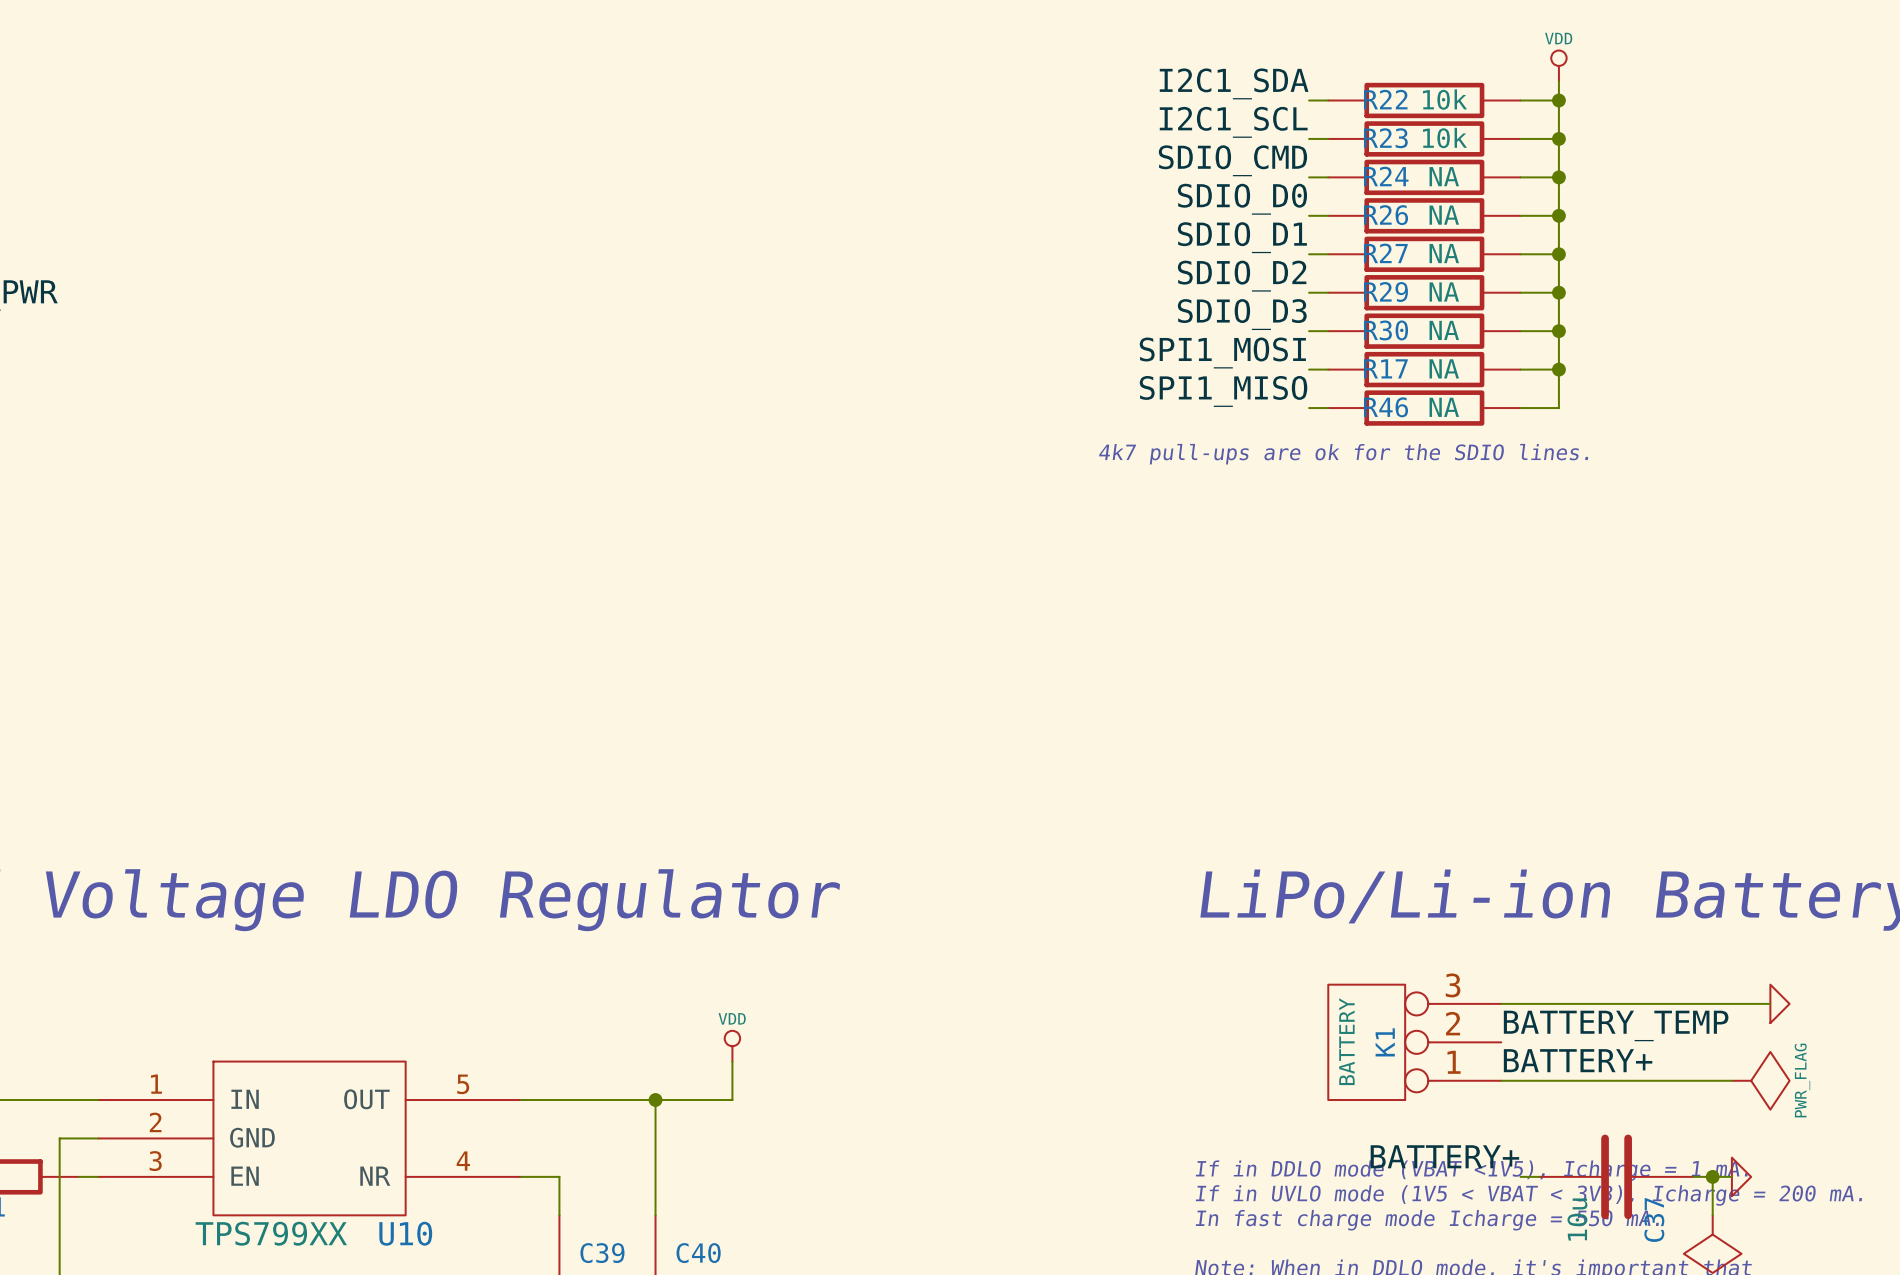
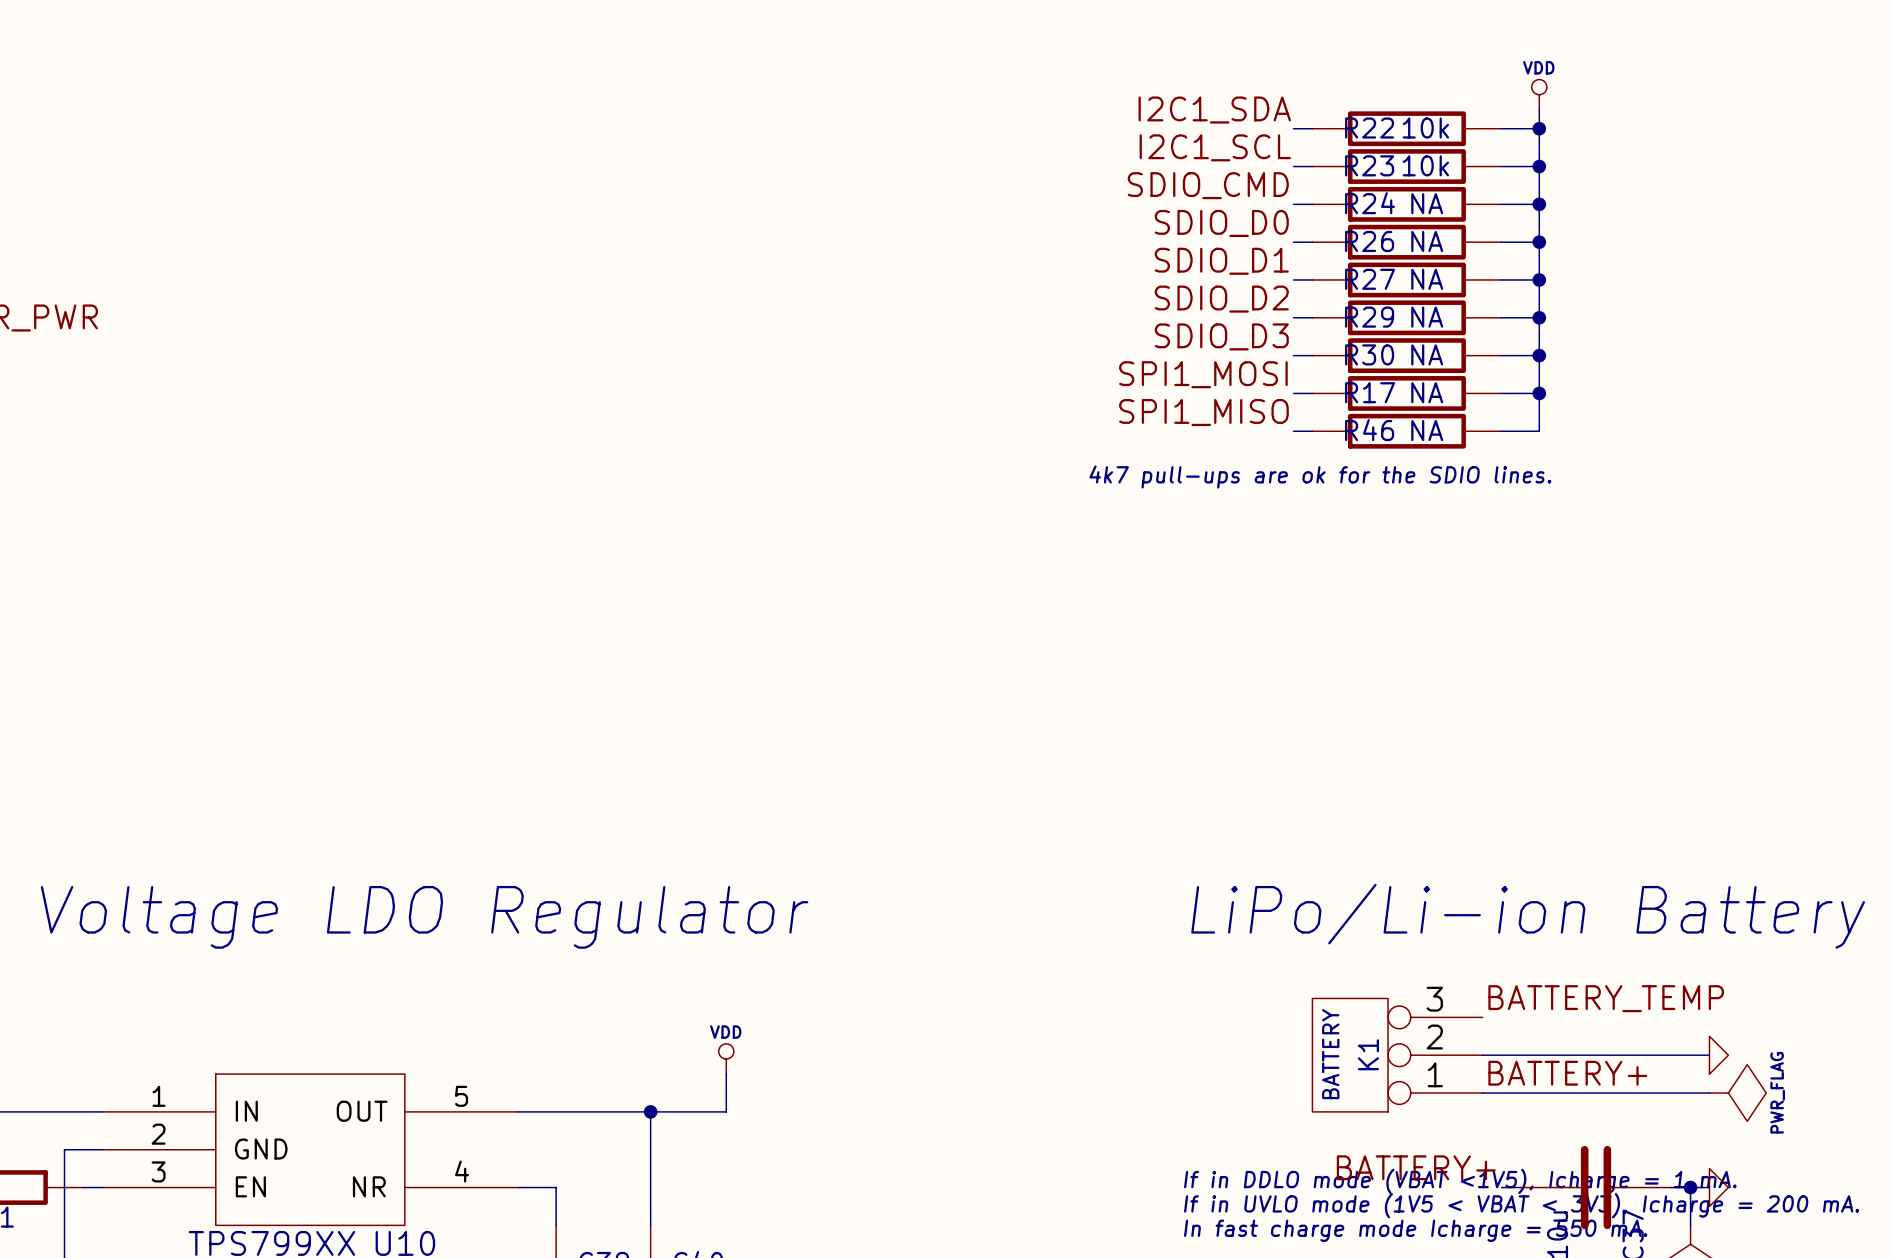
wire: (1501, 1003) (1770, 1003) -> none
power symbol position: (1779, 1003) -> (1718, 1055)
label position: BATTERY_TEMP (1616, 1025) -> BATTERY_TEMP (1606, 998)
wire: none -> (1482, 1055) (1709, 1055)

